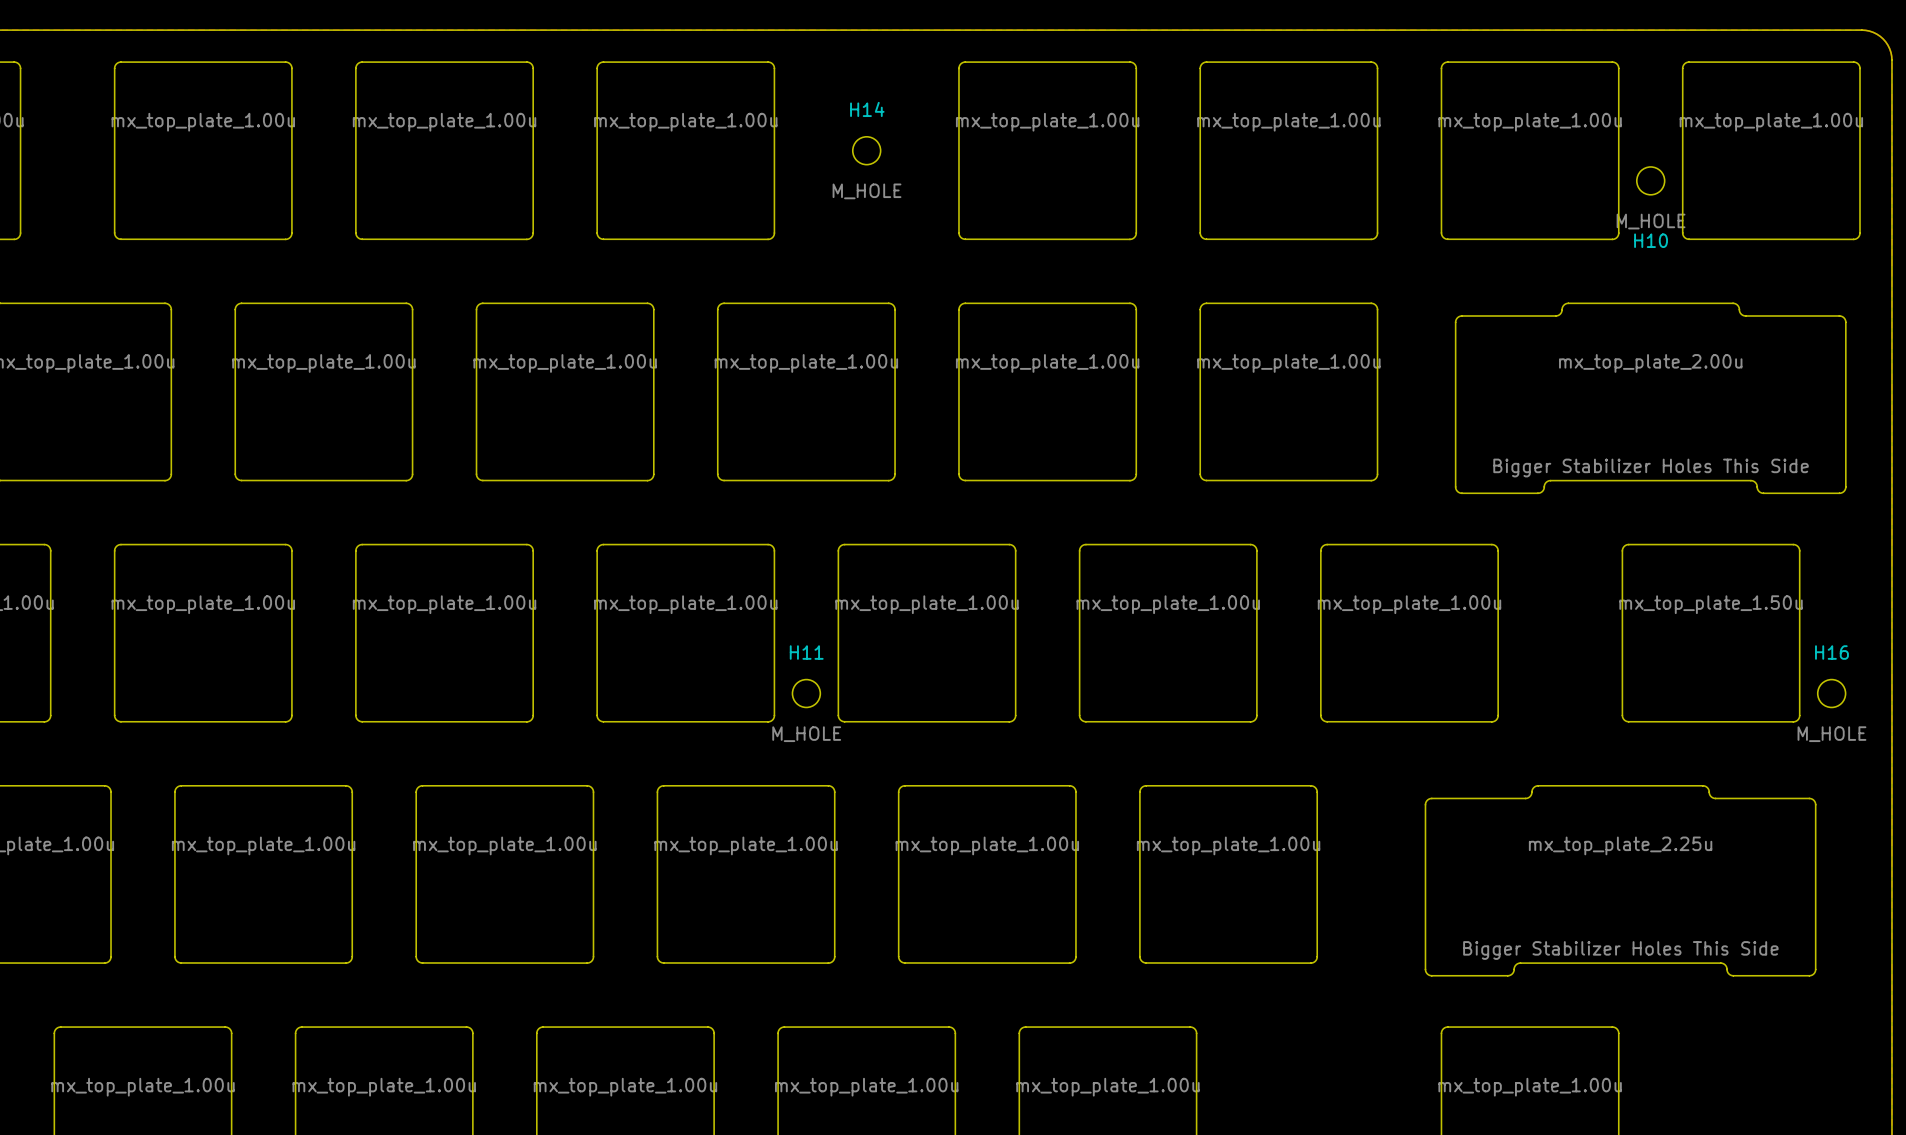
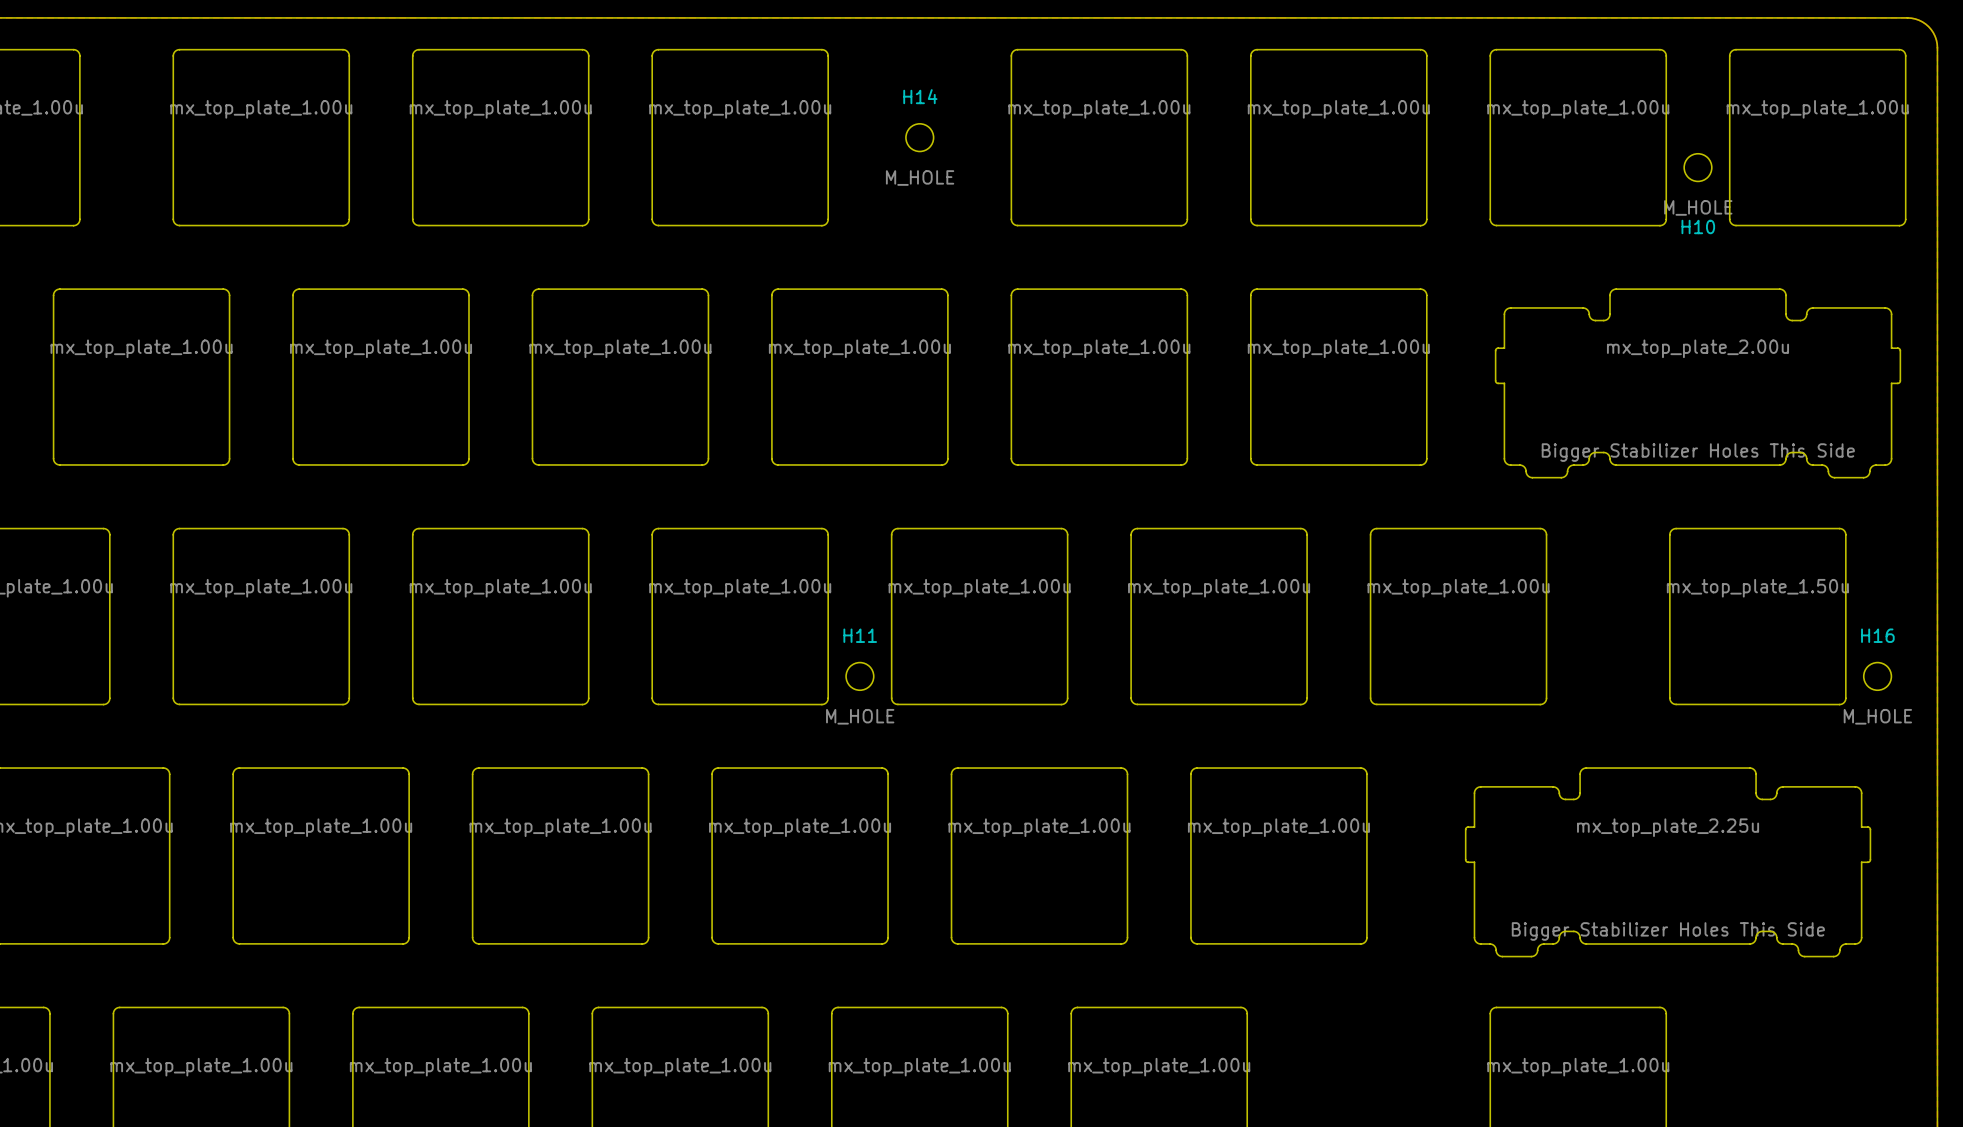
drawing shape: [1455, 302, 1847, 494] -> [1494, 288, 1901, 479]
drawing shape: [1424, 785, 1817, 977] -> [1465, 767, 1872, 958]

